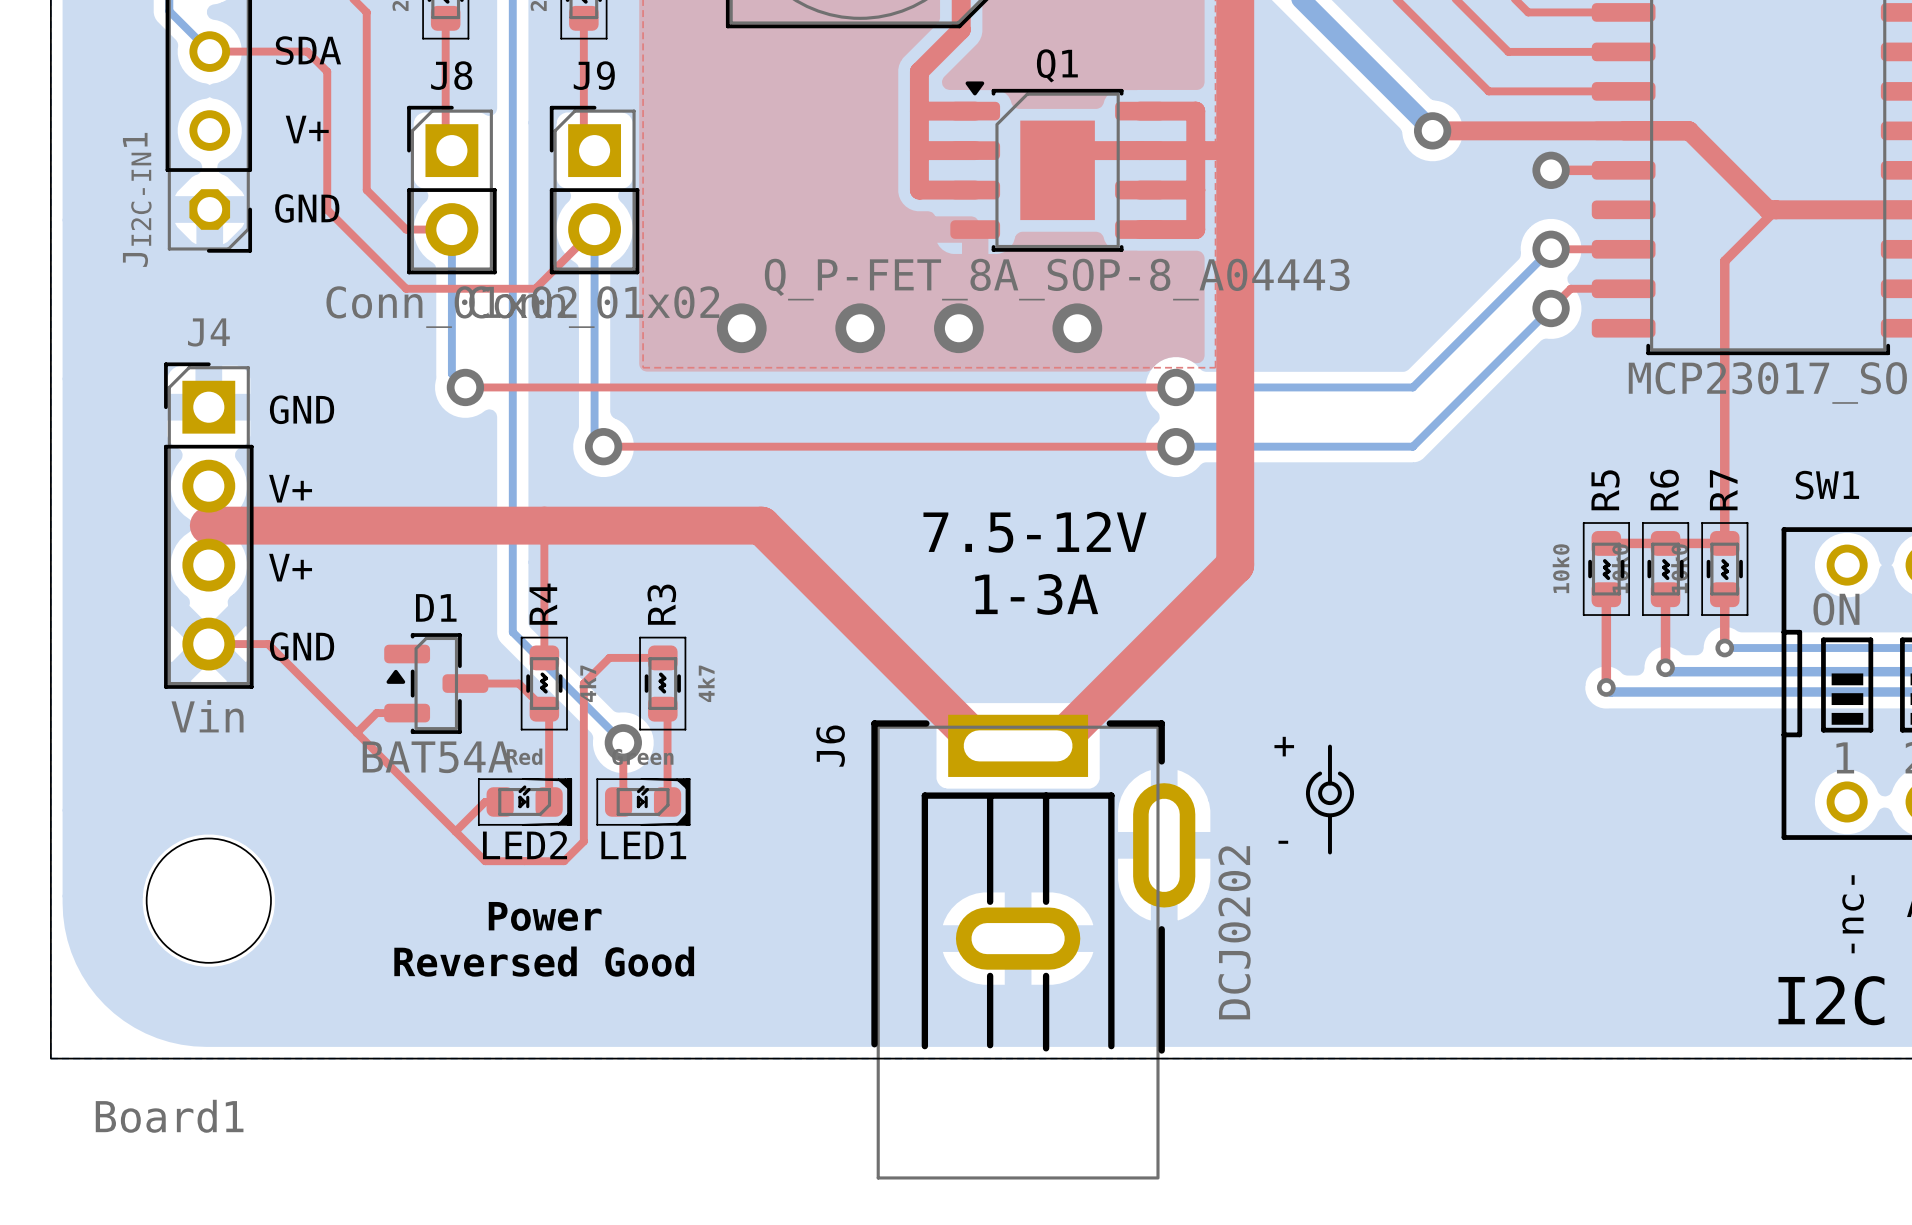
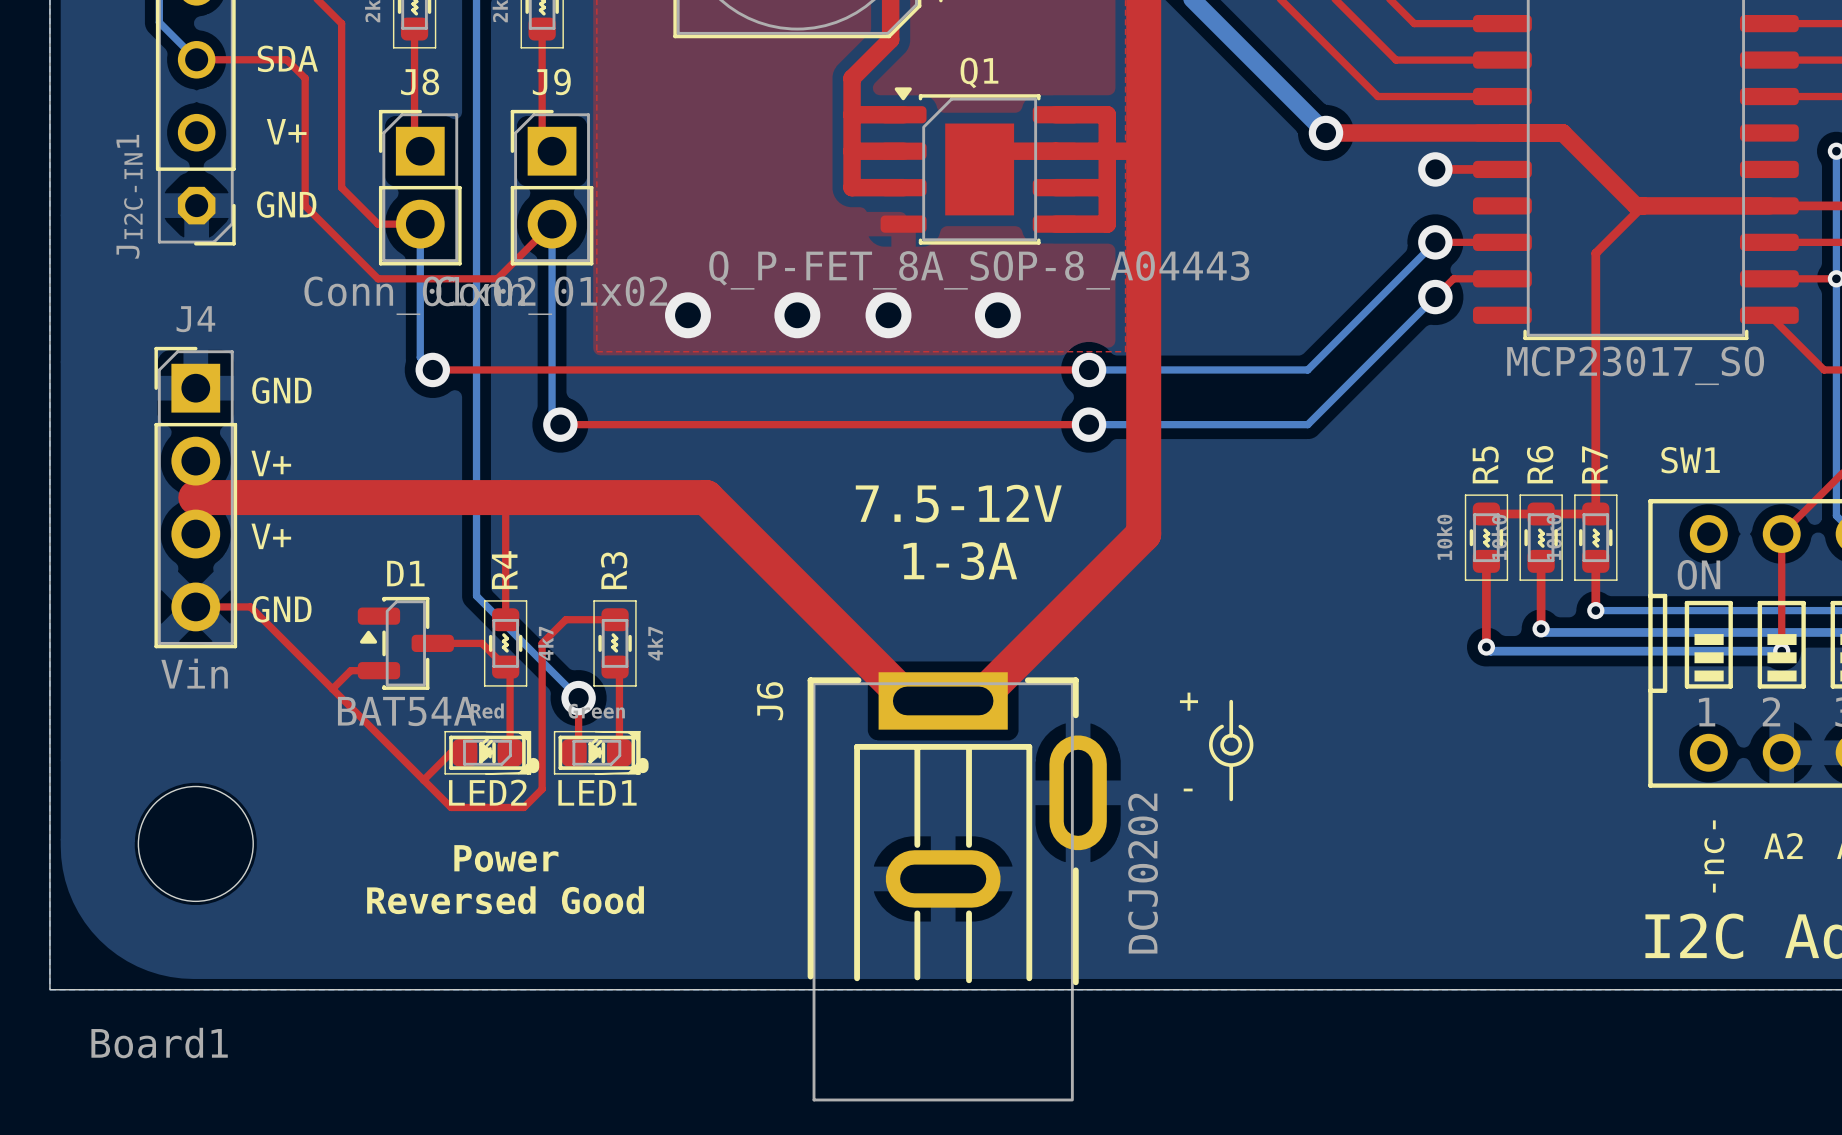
LED2 footprint: [478, 778, 573, 826] -> [444, 730, 540, 775]
LED1 footprint: [596, 778, 691, 826] -> [553, 730, 649, 775]

